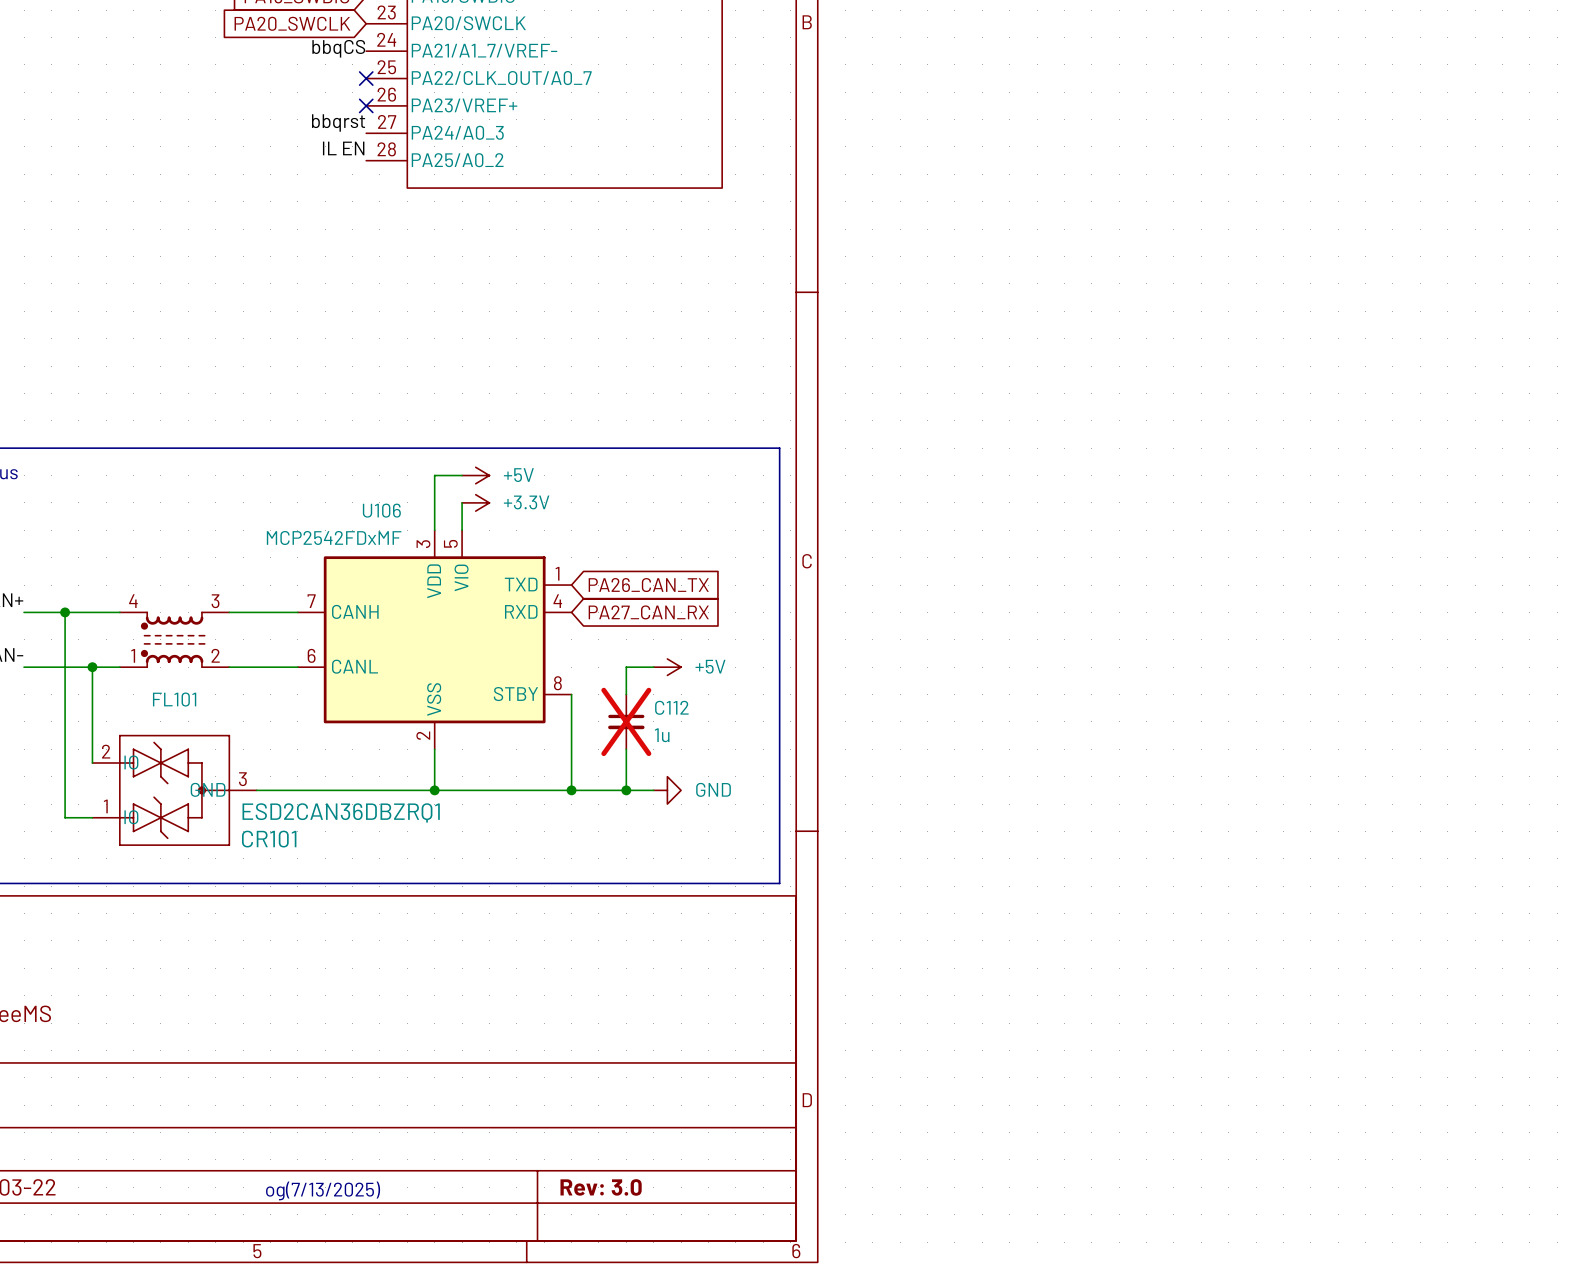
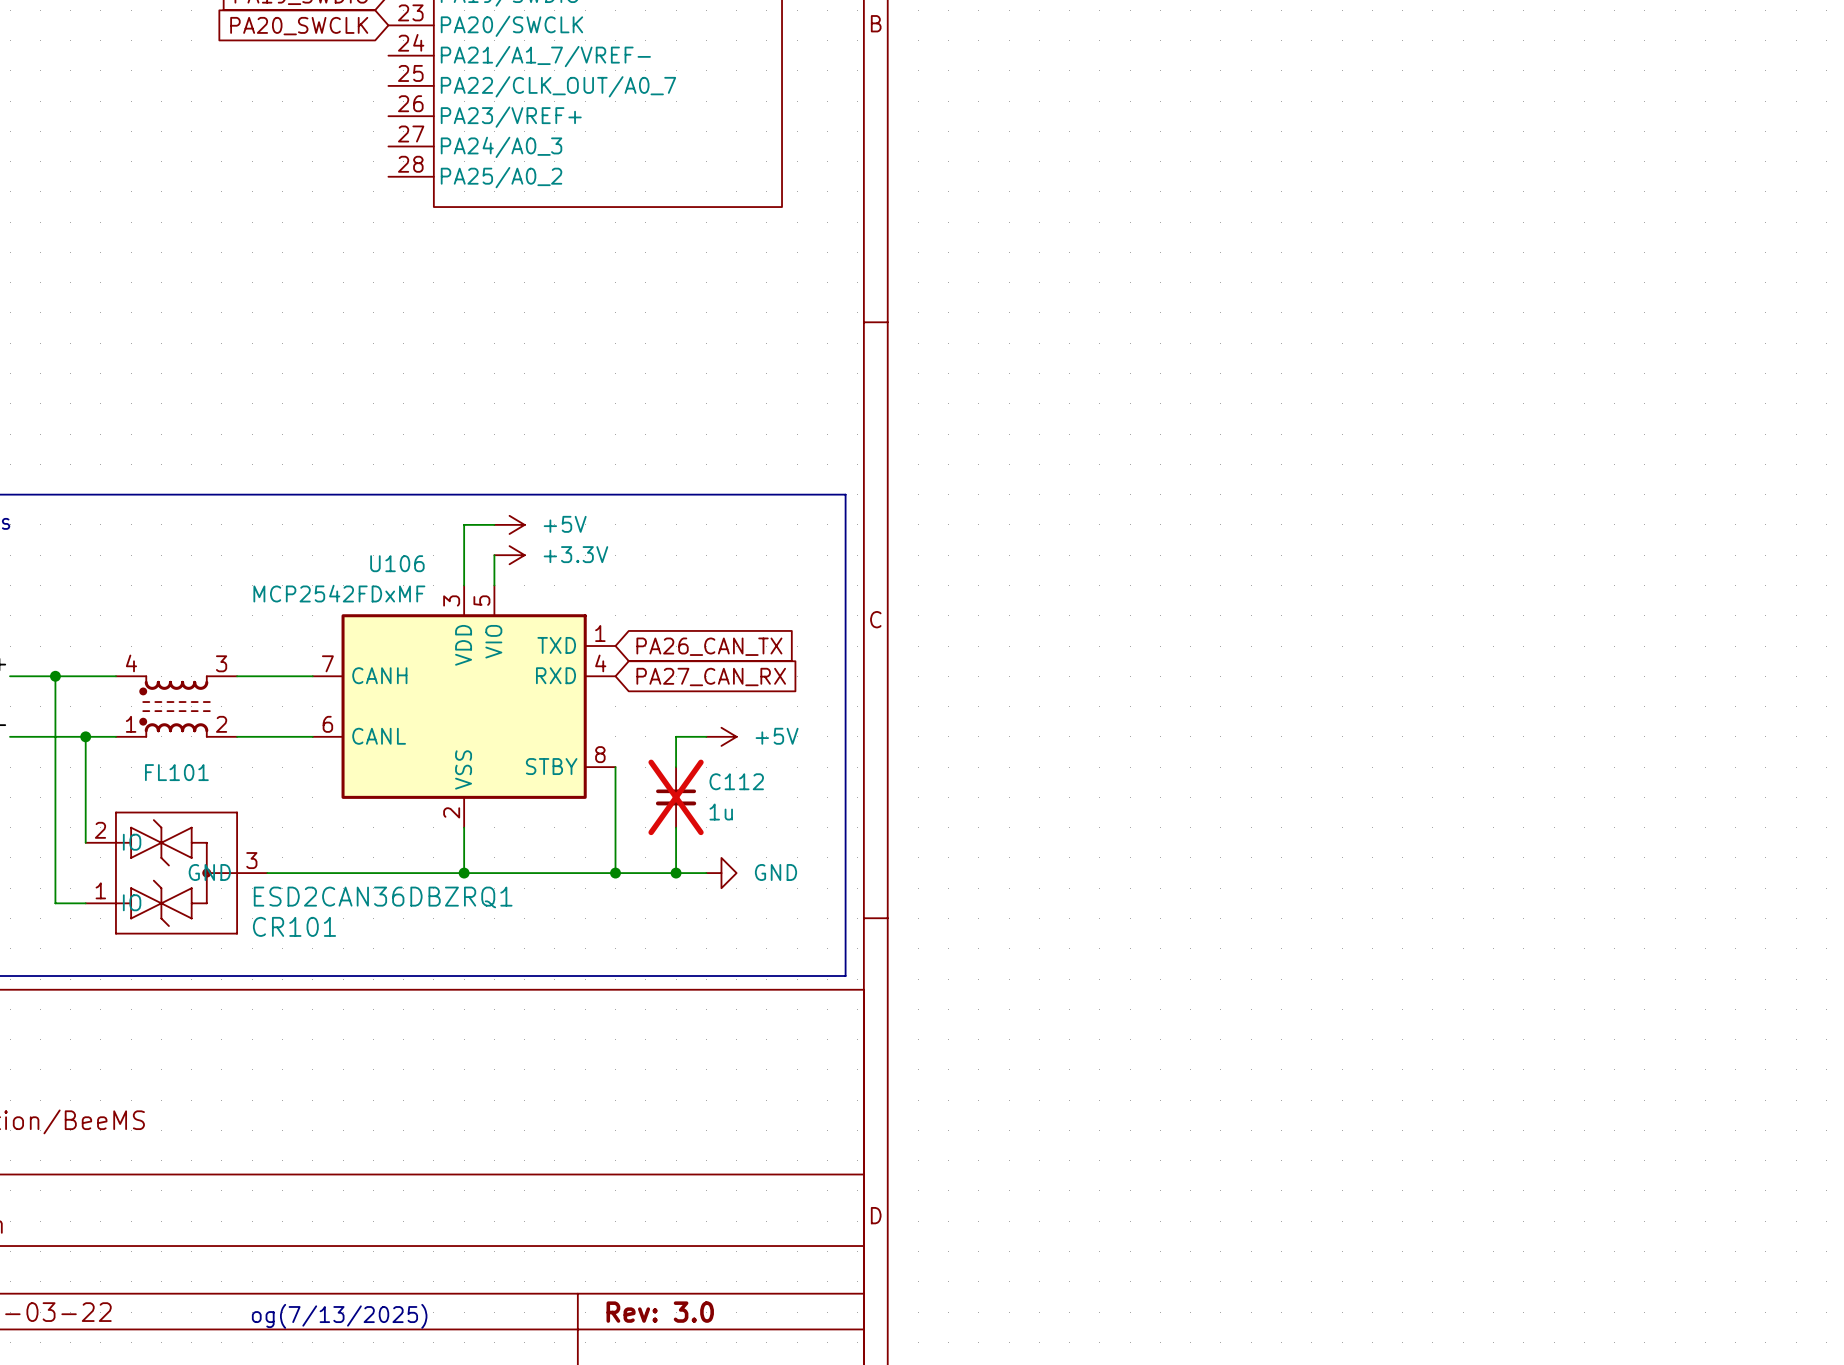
label: bbqCS (338, 48) -> none
no-connect mark: (366, 78) -> none
no-connect mark: (366, 105) -> none
label: bbqrst (338, 122) -> none
label: IL EN (343, 148) -> none

